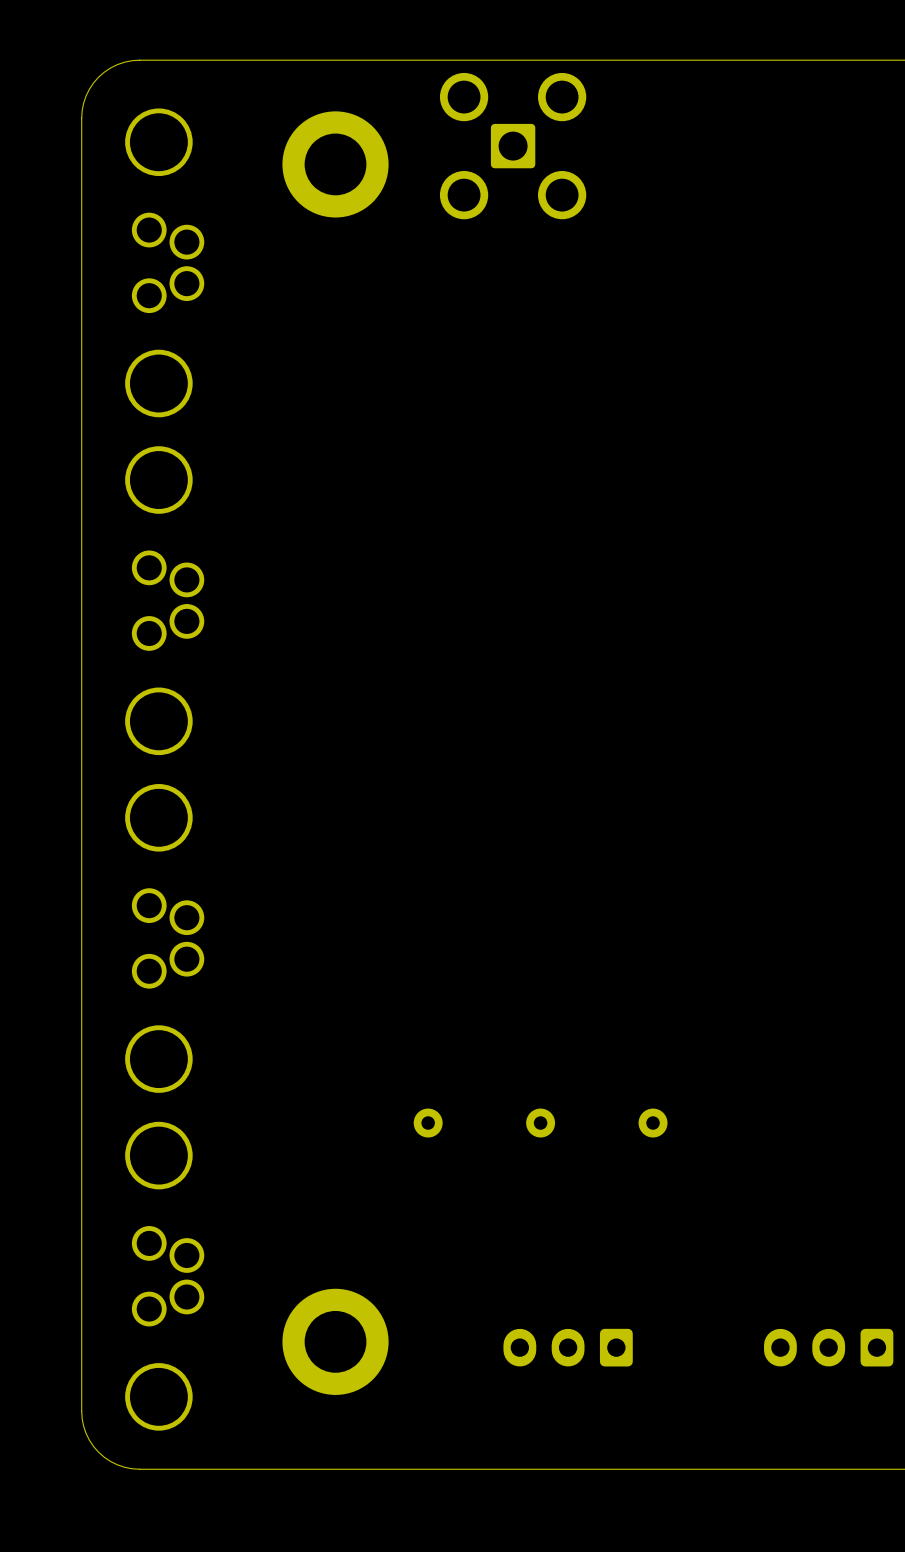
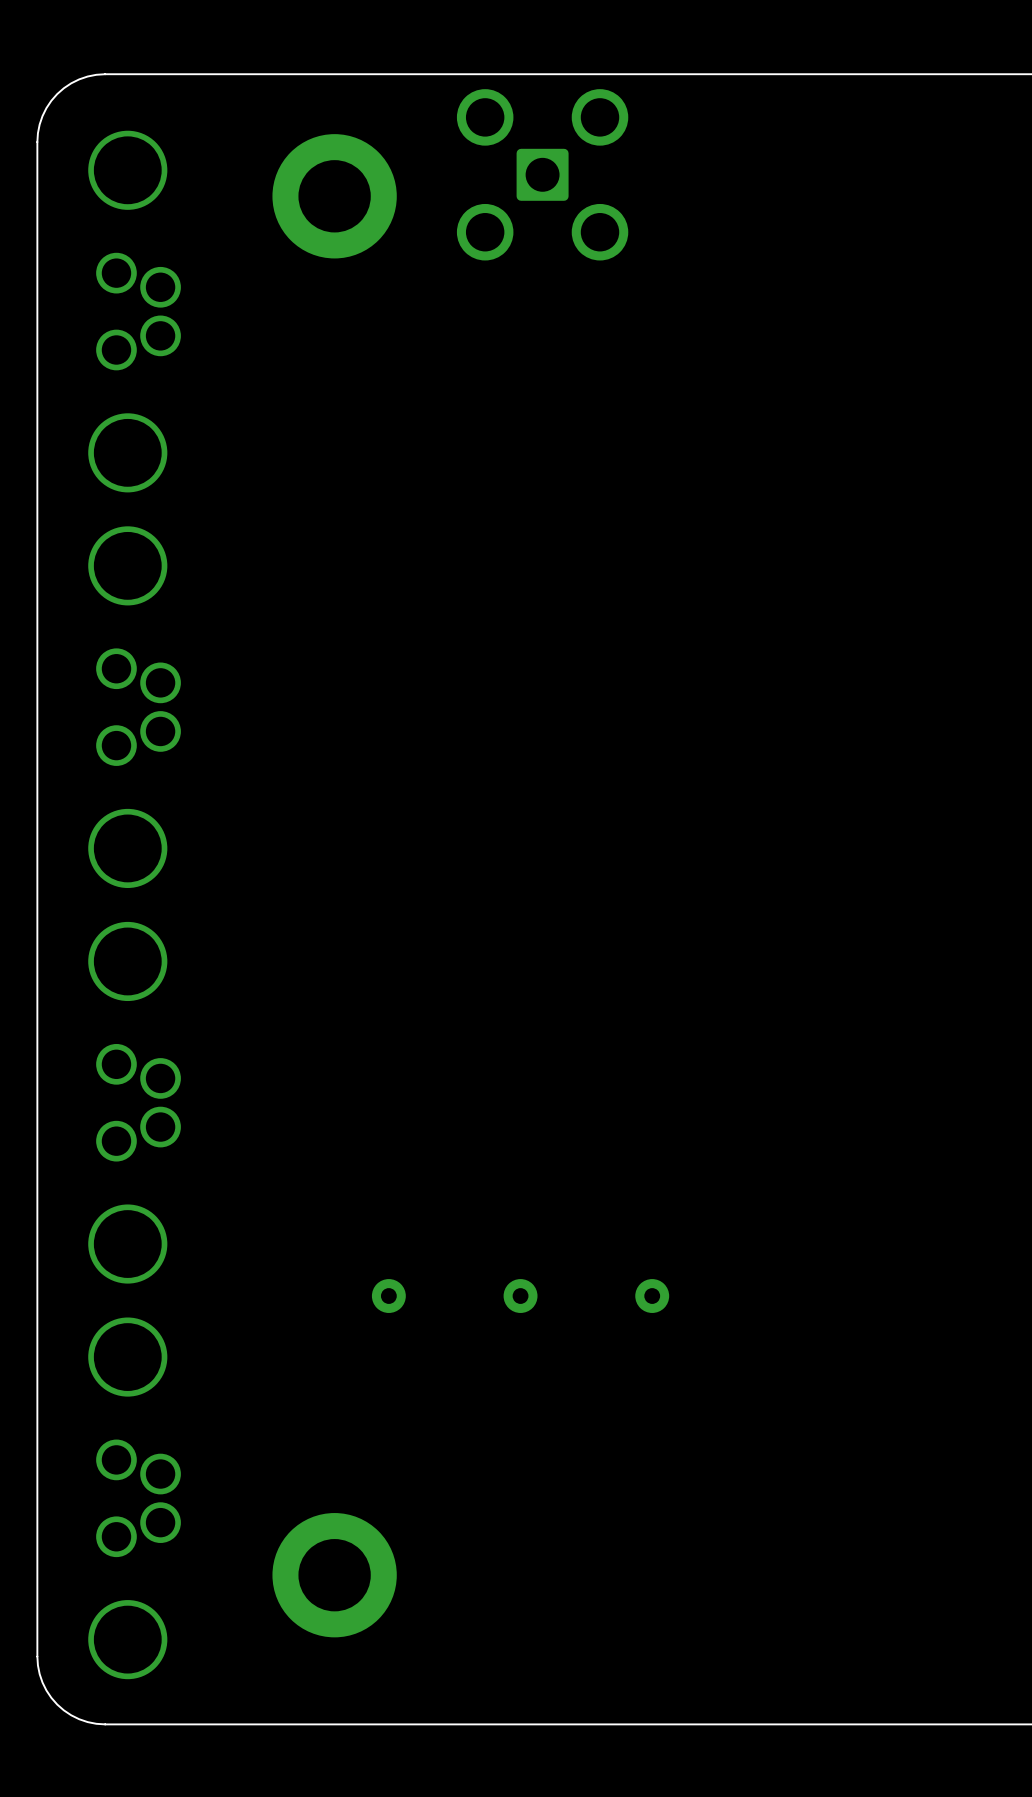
part: none -> (388, 1296)
part: none -> (520, 1296)
part: none -> (652, 1296)
part: (428, 1123) -> none
part: (540, 1123) -> none
part: (653, 1123) -> none
part: (568, 1347) -> none
part: (828, 1347) -> none

